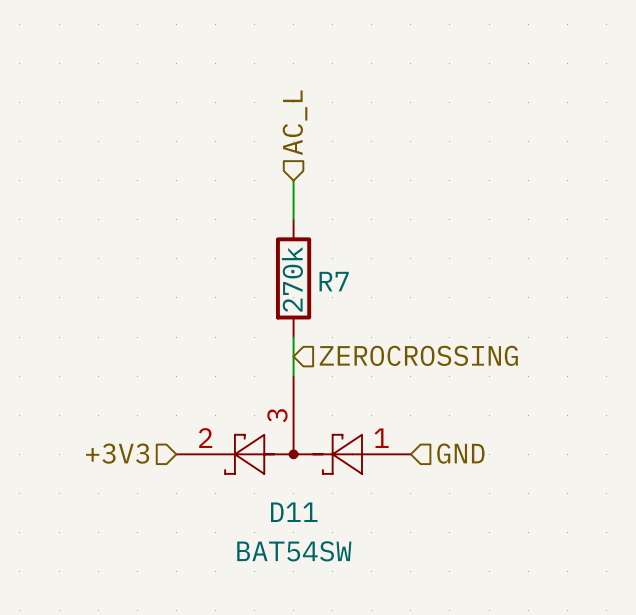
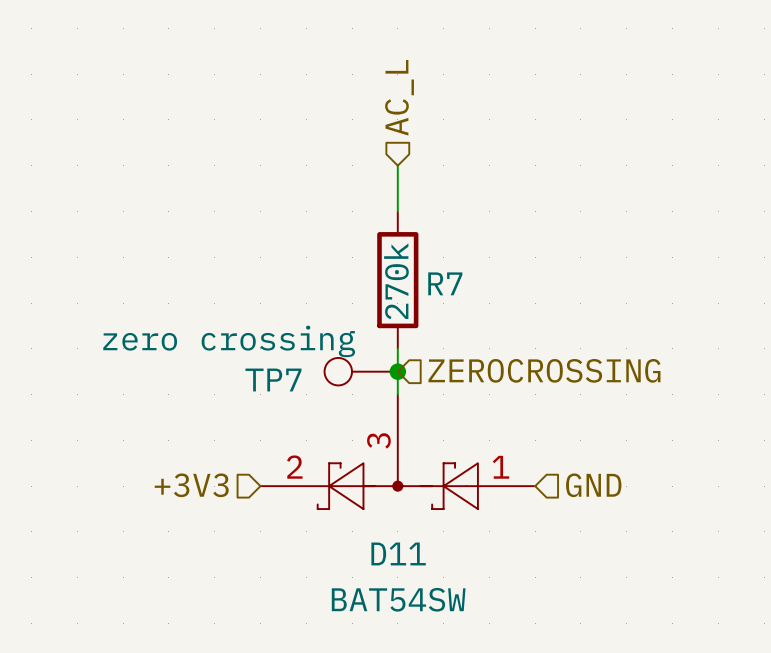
TP7: none -> zero crossing (361, 371)
junction: none -> (397, 371)

